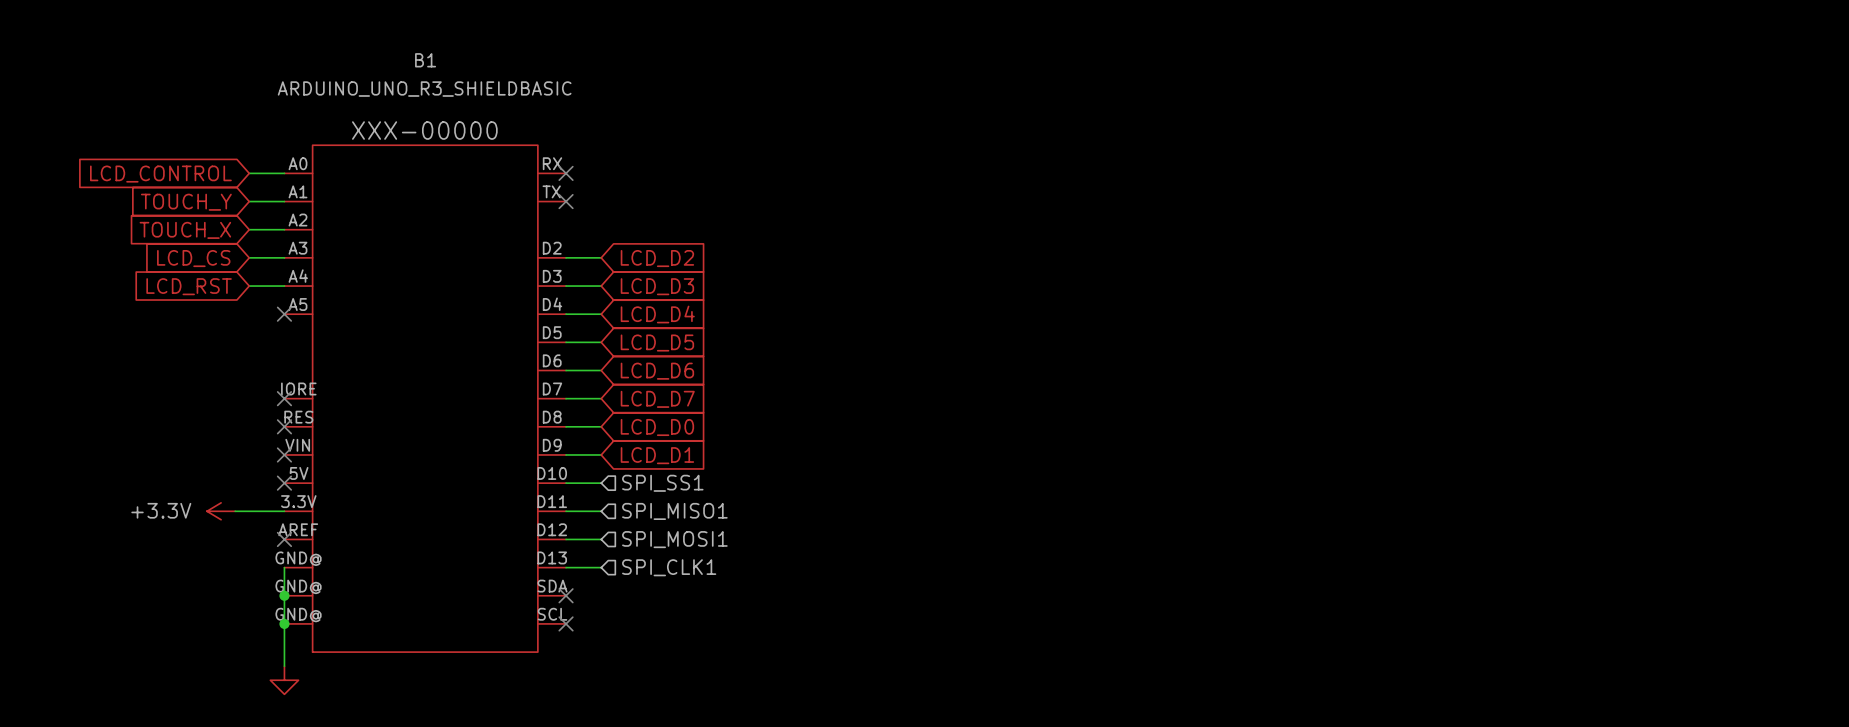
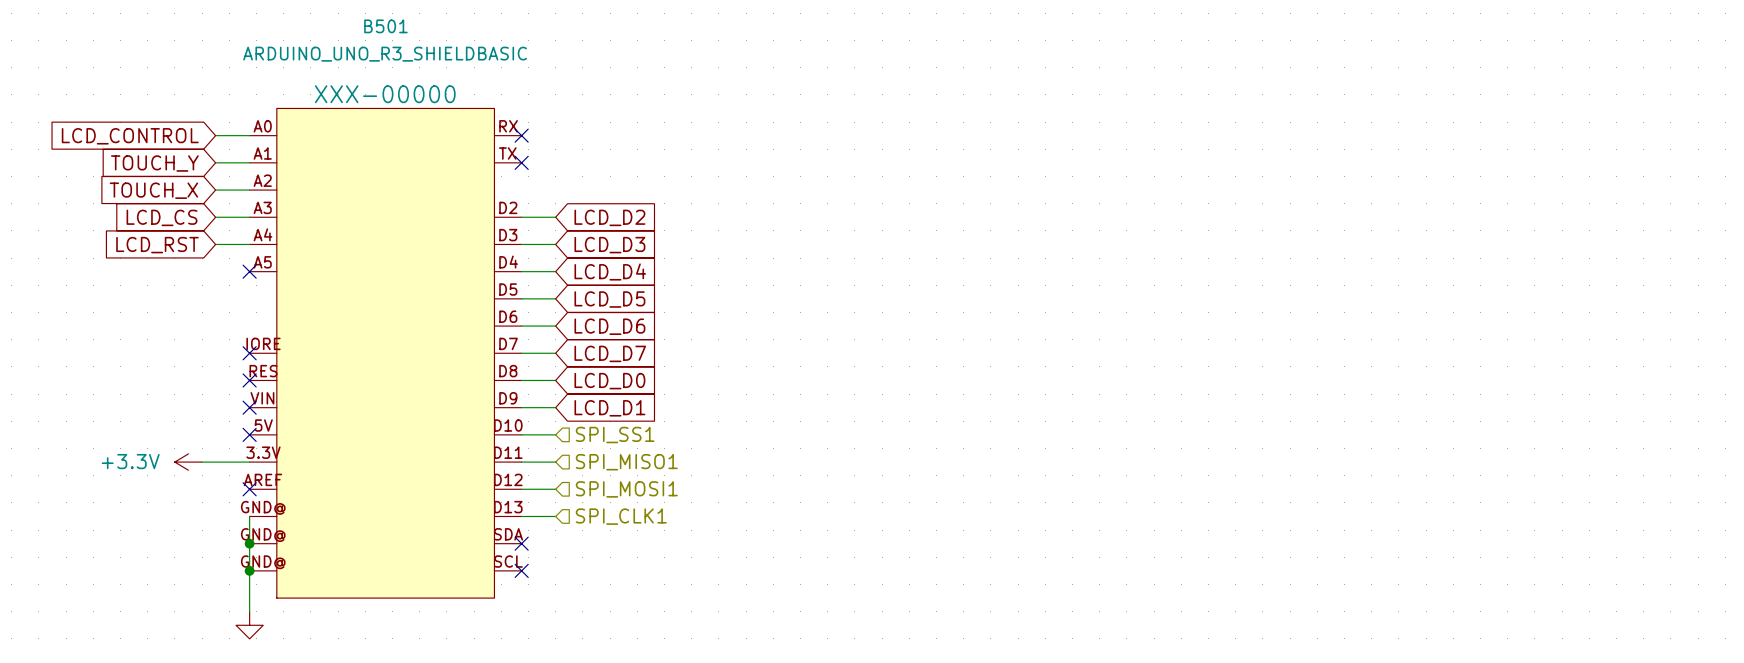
B1 name: B1 (425, 60) -> B501 (385, 26)

